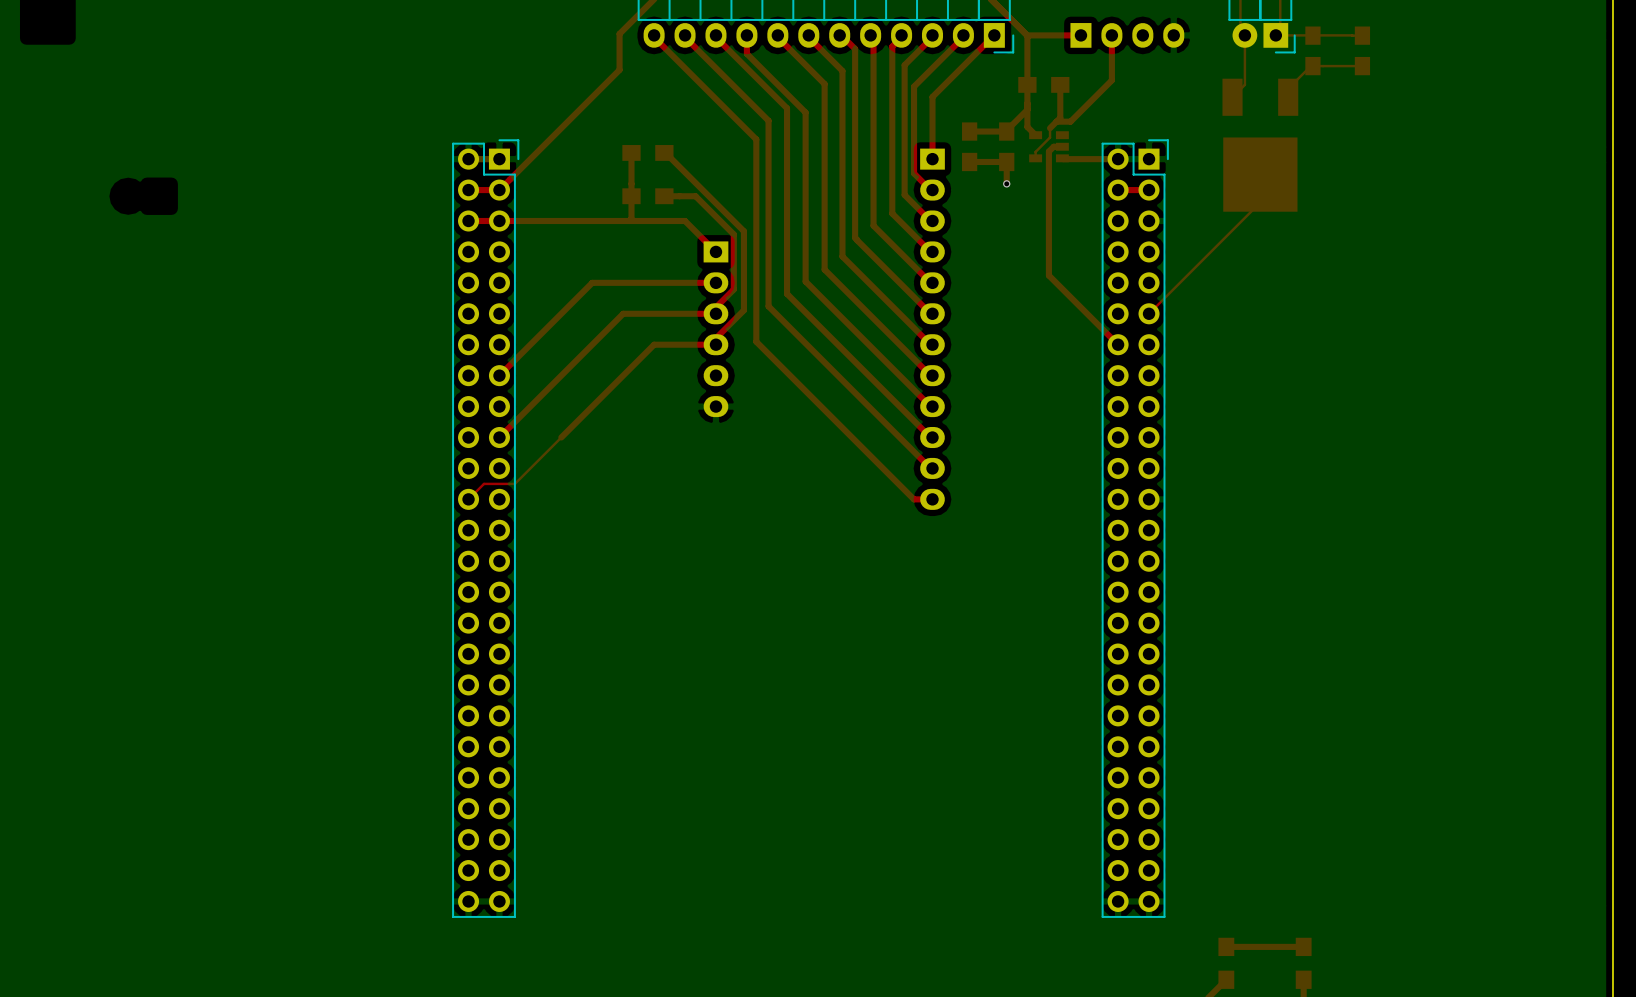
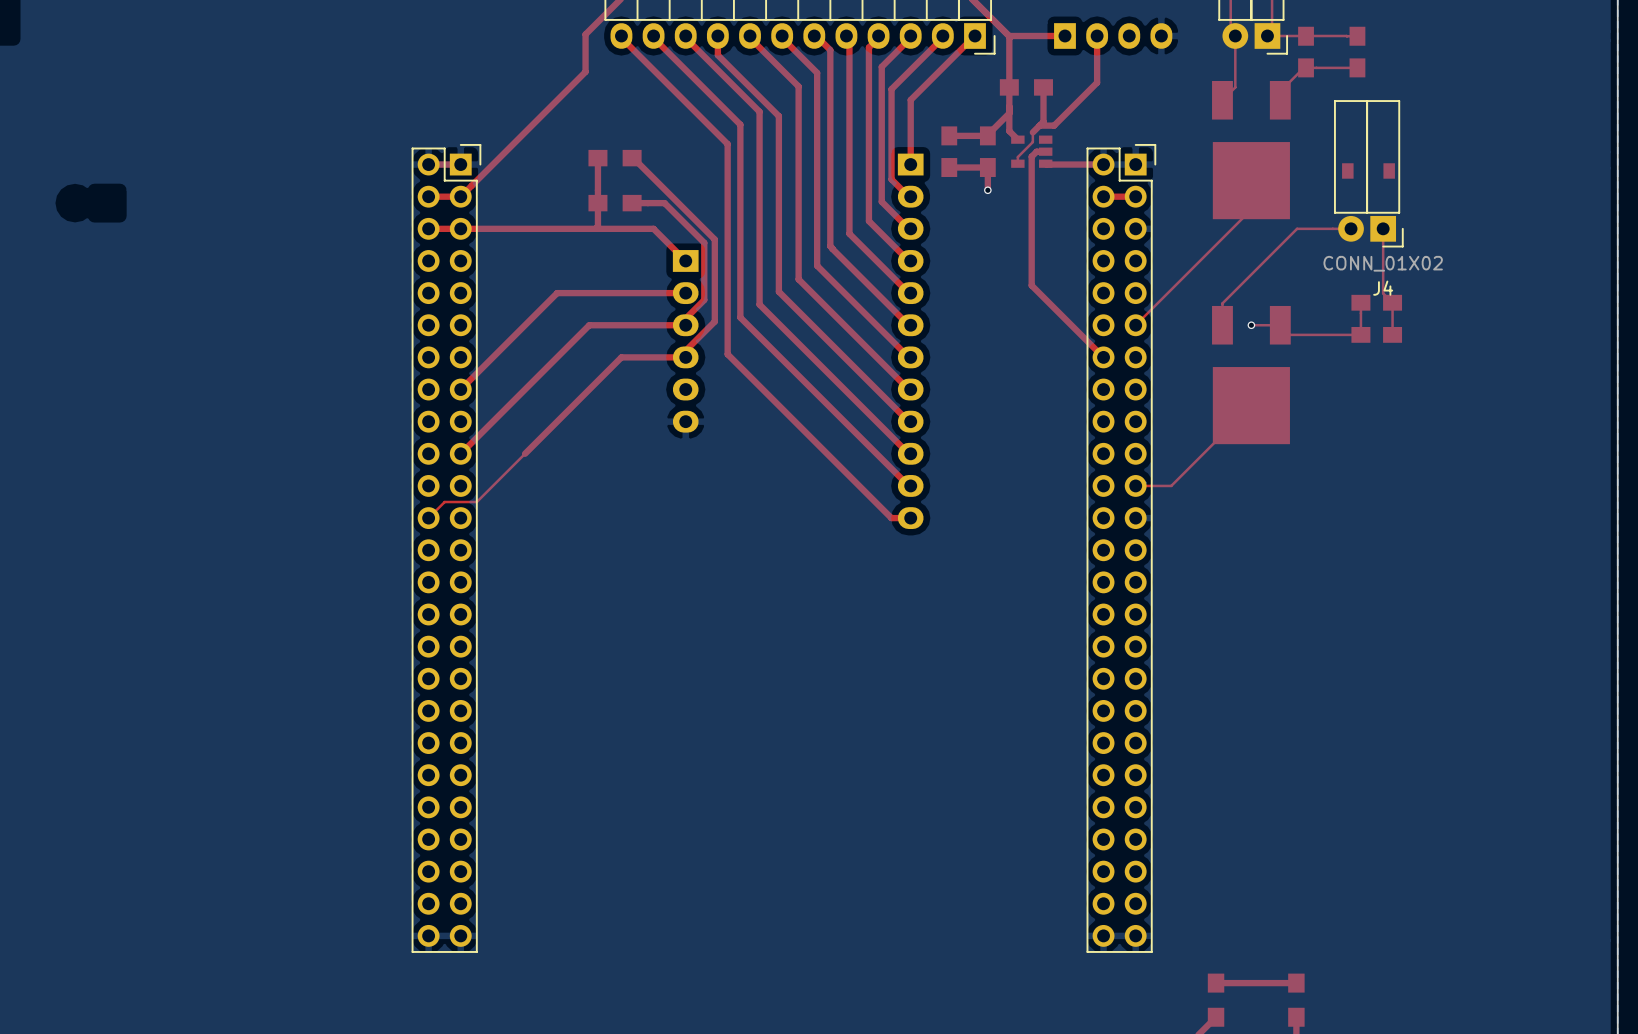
part: none -> (1368, 170)
J4: none -> CONN_01X02 (1368, 173)
top track: none -> (1351, 228) (1297, 228) (1222, 303) (1222, 325)
top track: none -> (1383, 228) (1383, 293) (1392, 302) (1392, 334)
top track: none -> (1360, 302) (1360, 334) (1289, 334) (1280, 325) (1251, 325)
part: none -> (1376, 302)
via: none -> (1251, 325)
part: none -> (1376, 334)
part: none -> (1251, 375)
top track: none -> (1251, 405) (1171, 485) (1135, 485)

